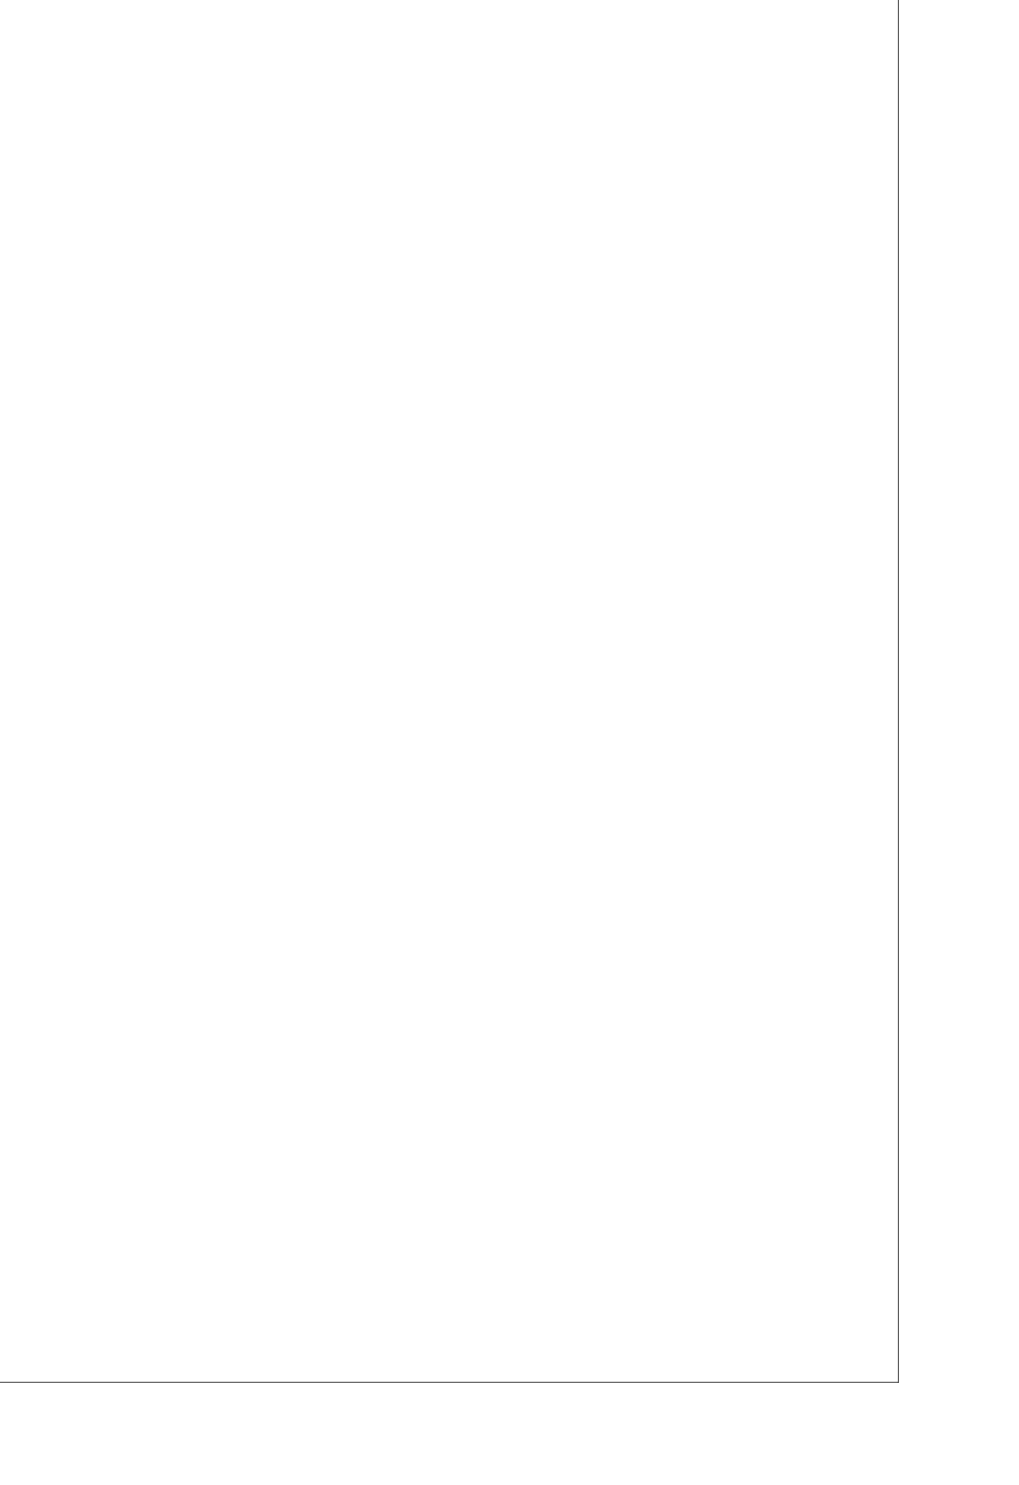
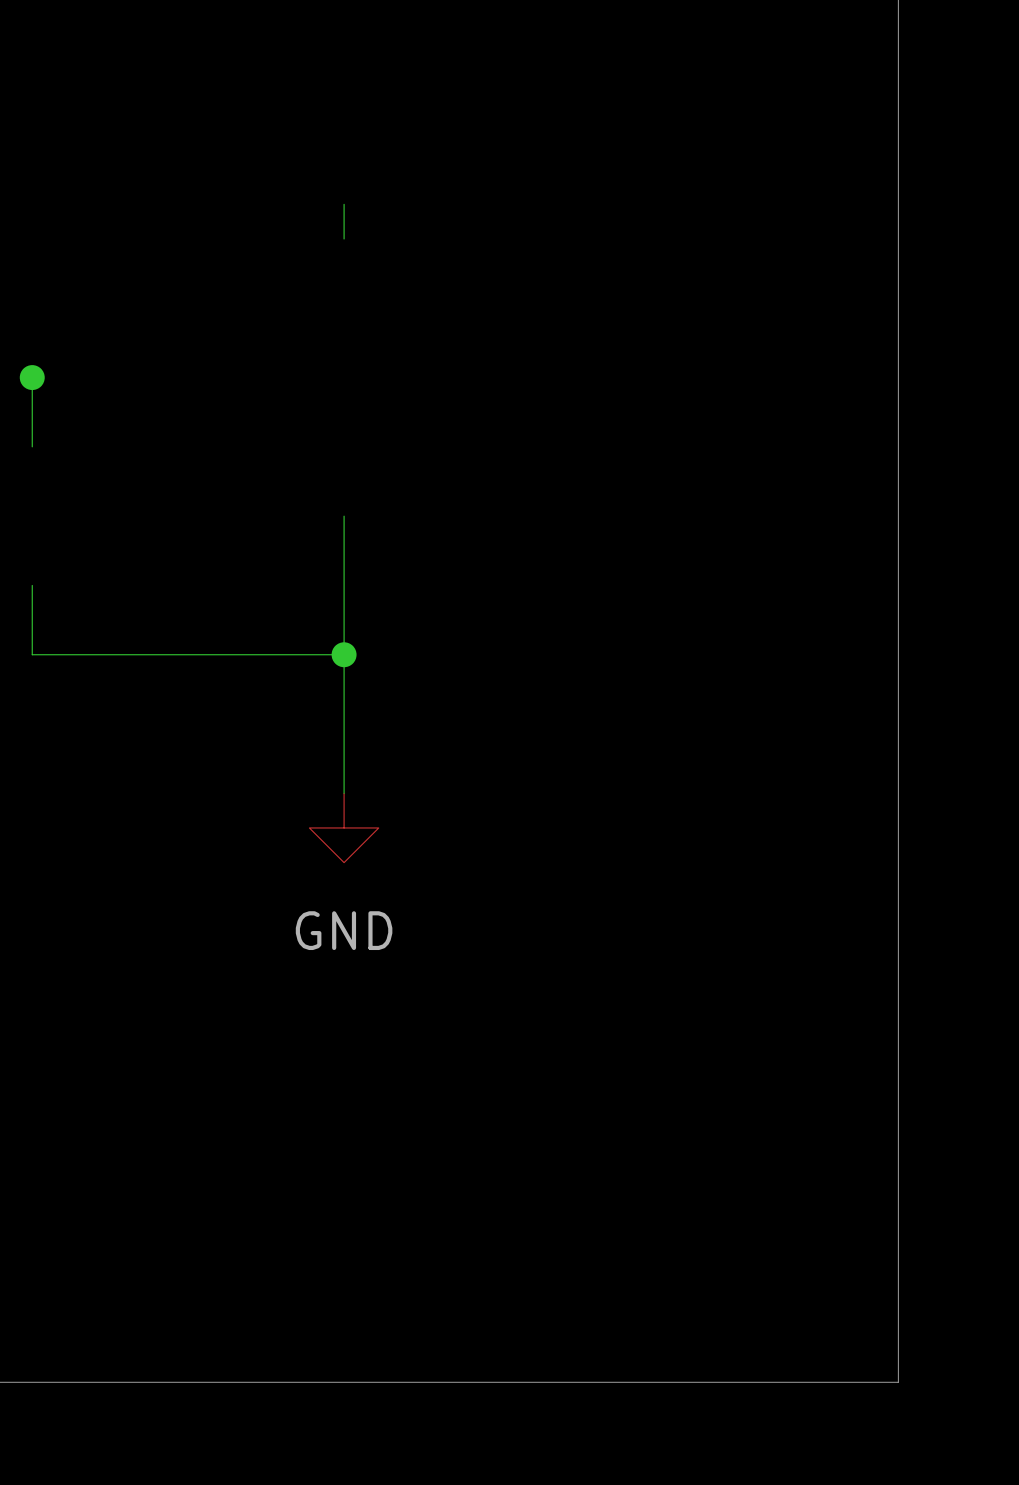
wire: none -> (344, 204) (344, 238)
wire: none -> (32, 377) (32, 446)
junction: none -> (32, 377)
wire: none -> (344, 516) (344, 793)
wire: none -> (32, 585) (32, 654) (344, 654)
junction: none -> (344, 654)
power symbol: none -> GND (344, 827)

